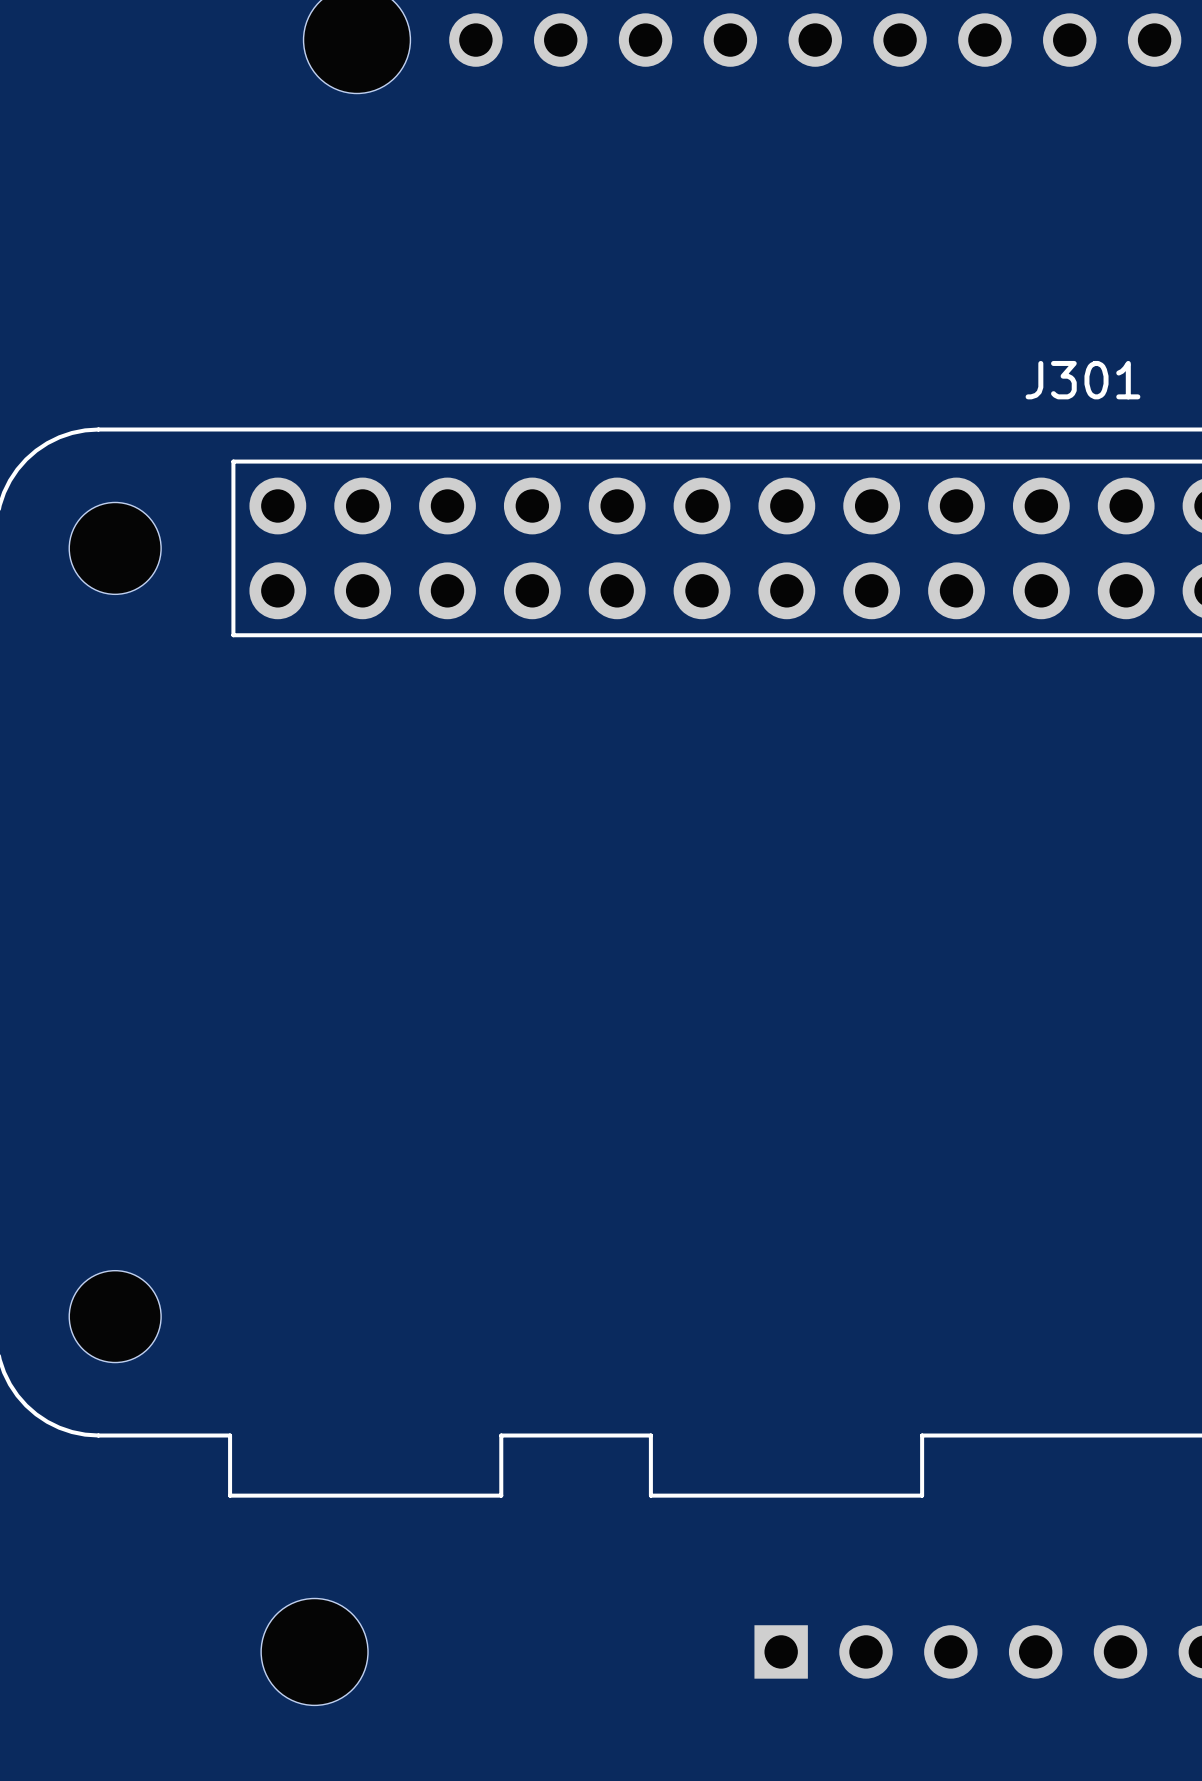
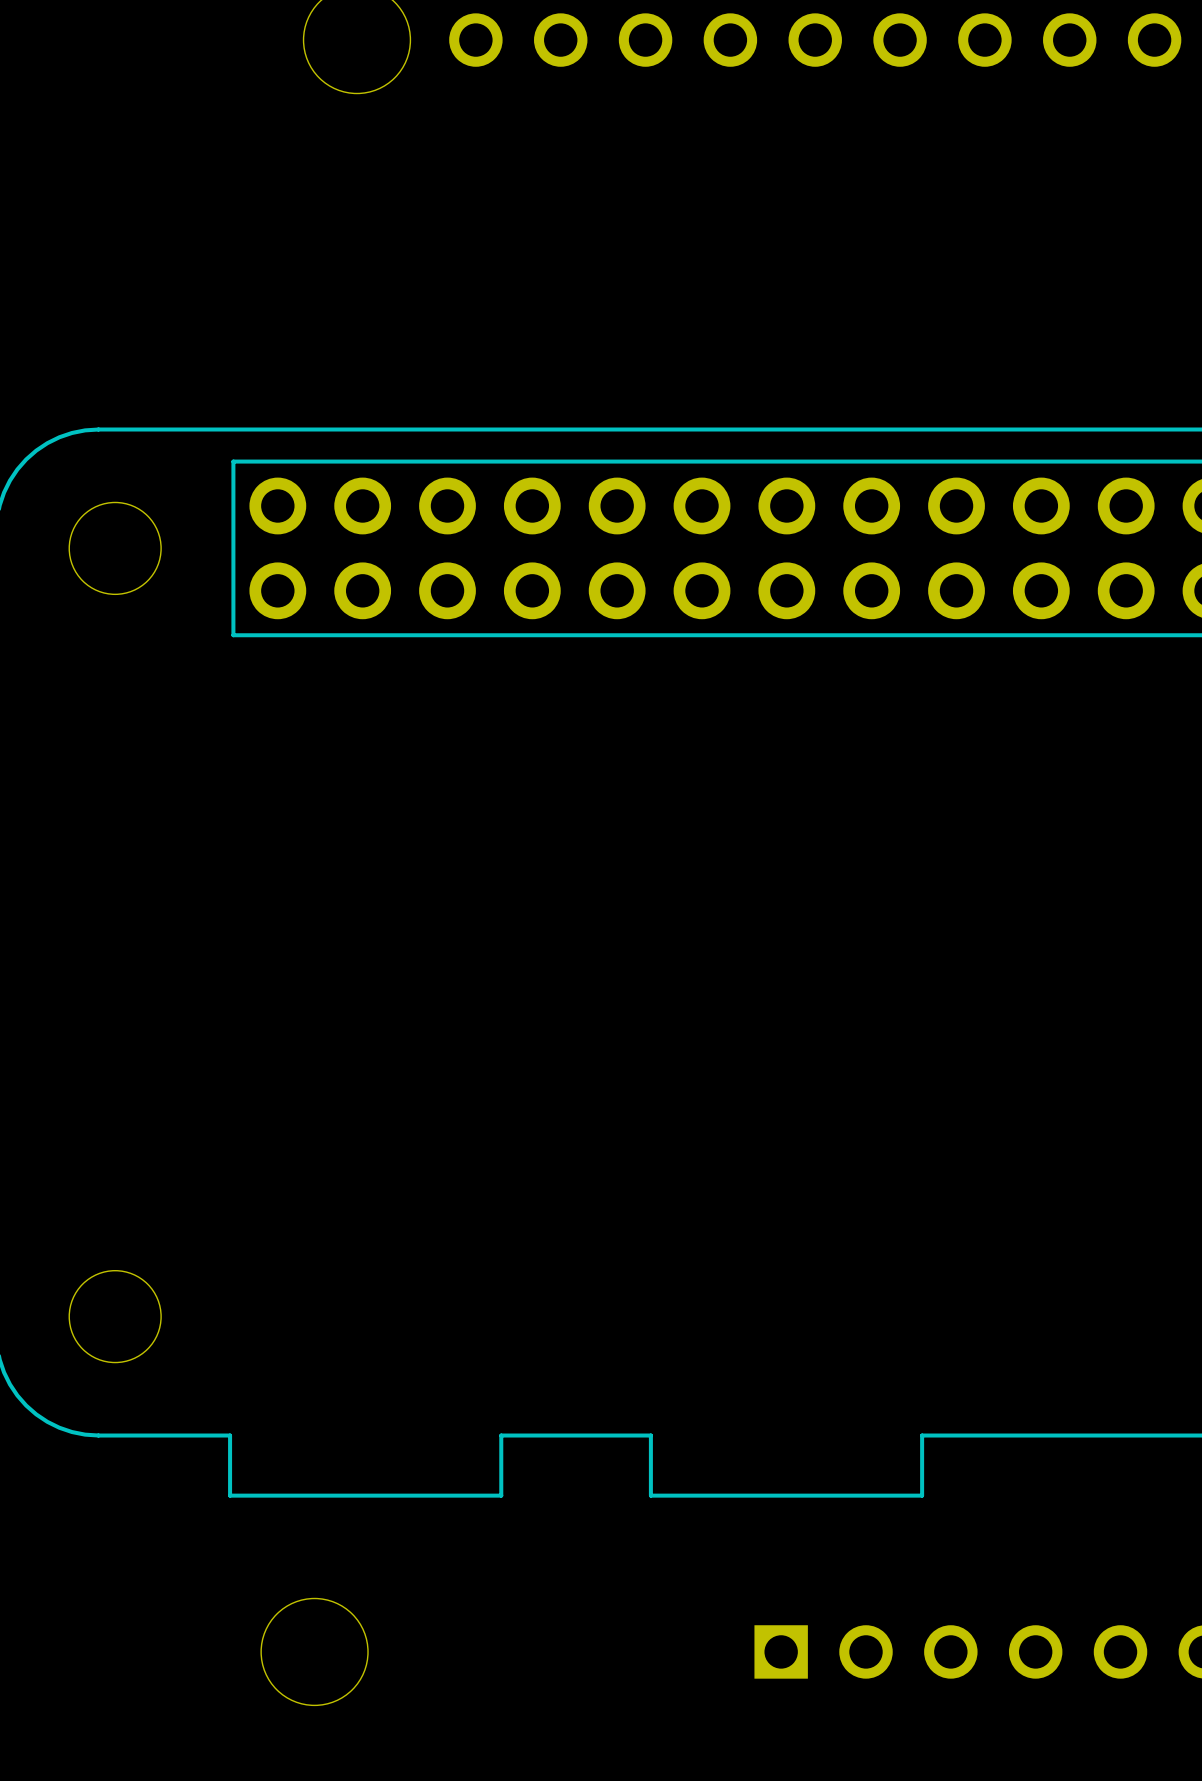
J301 name: J301 (1082, 380) -> none

